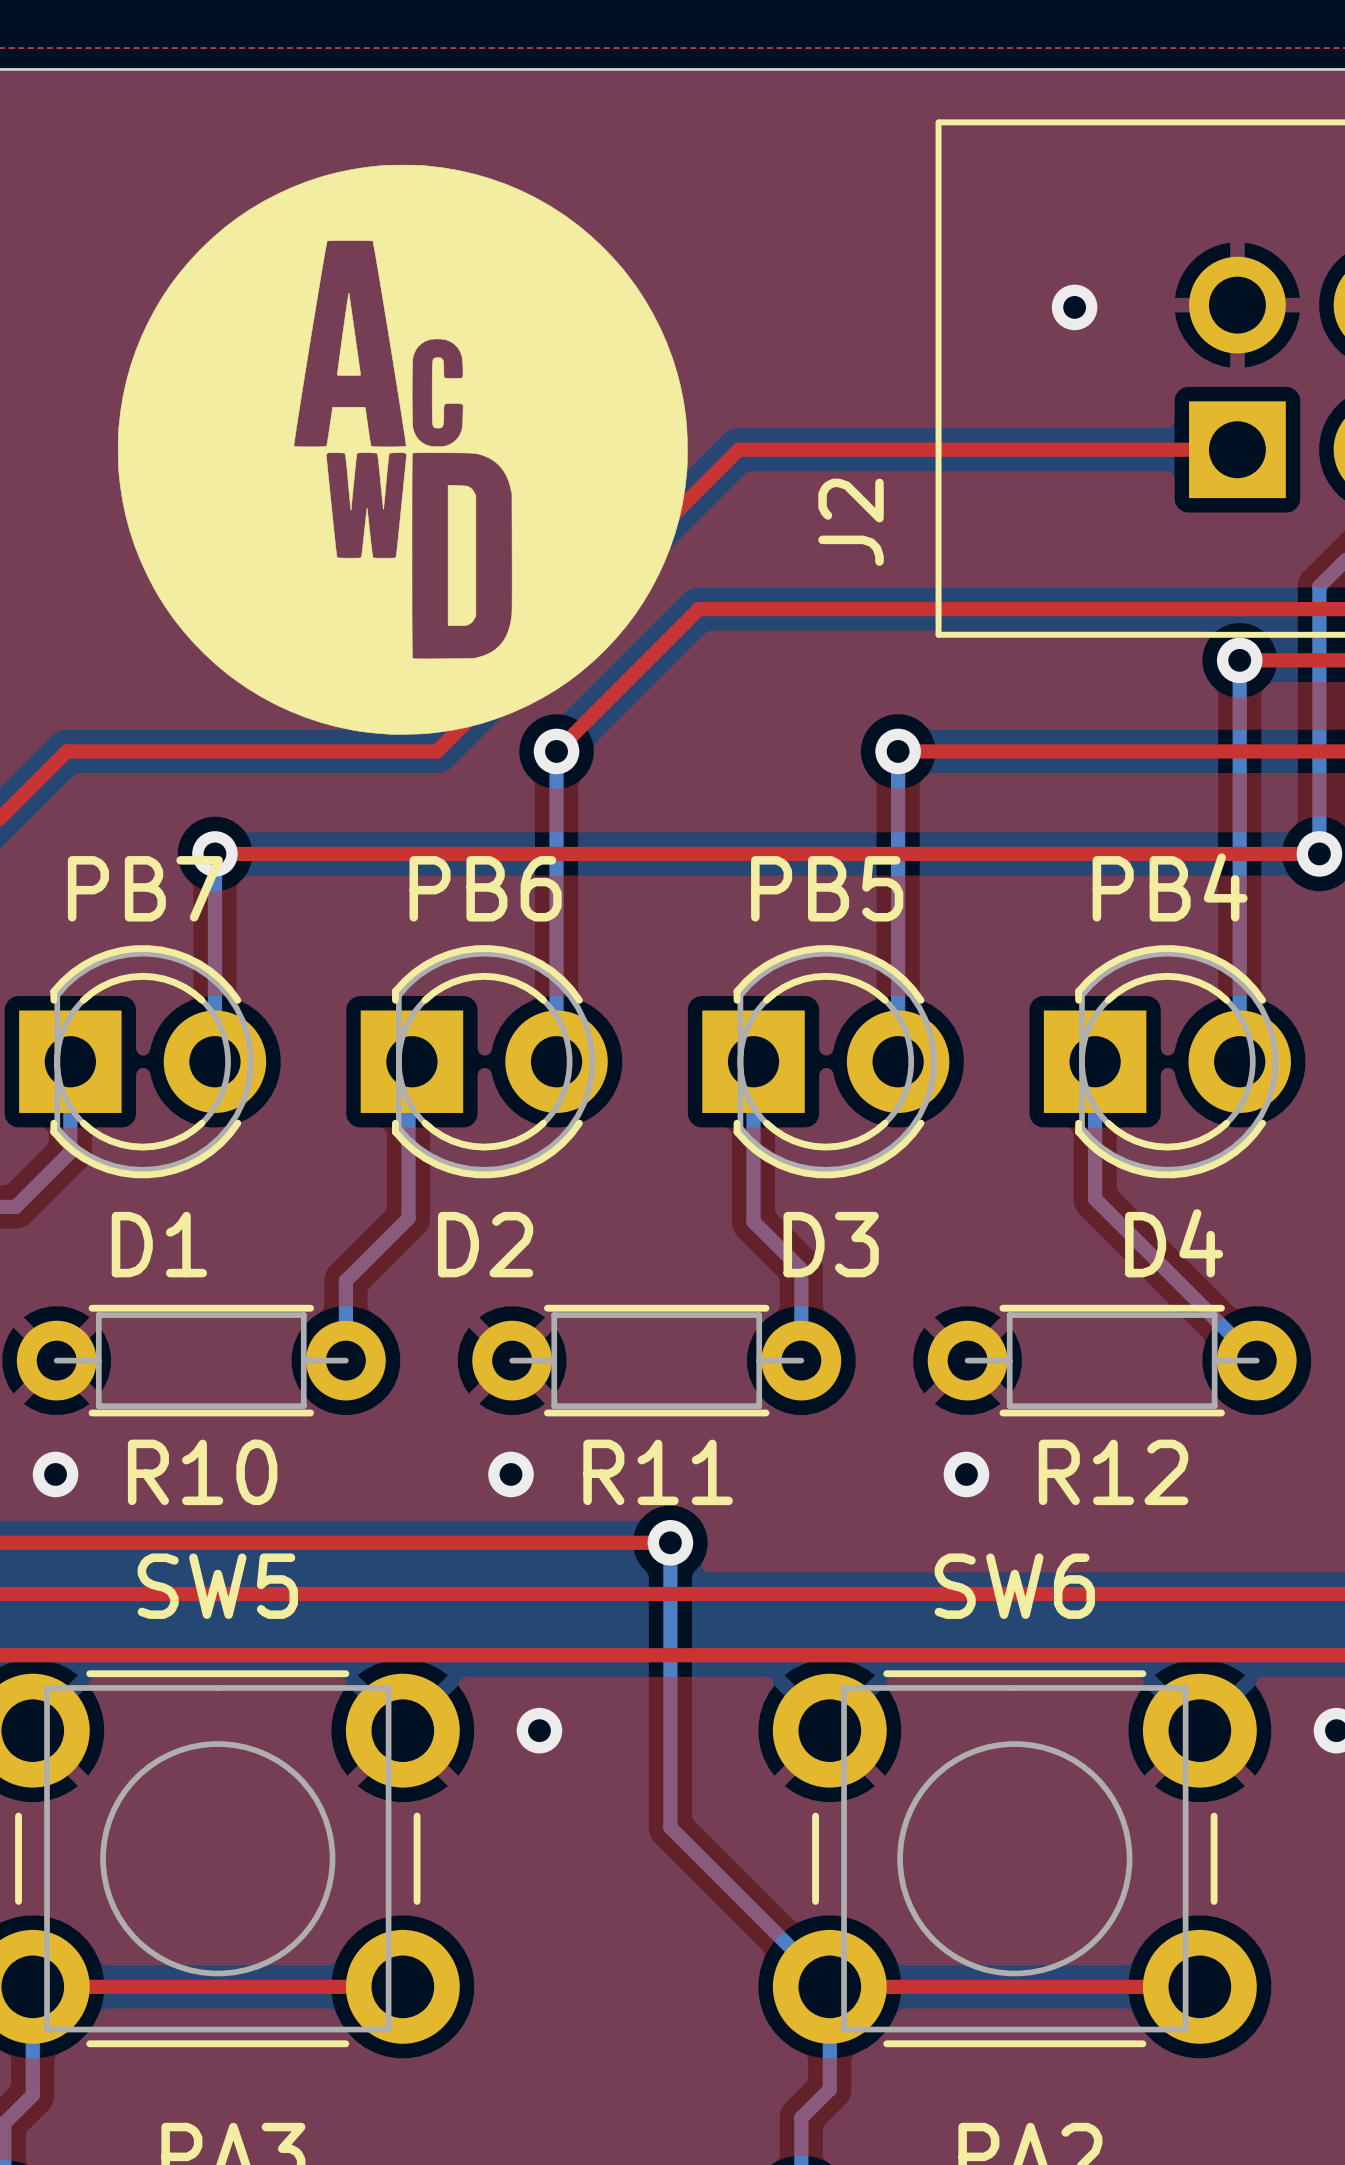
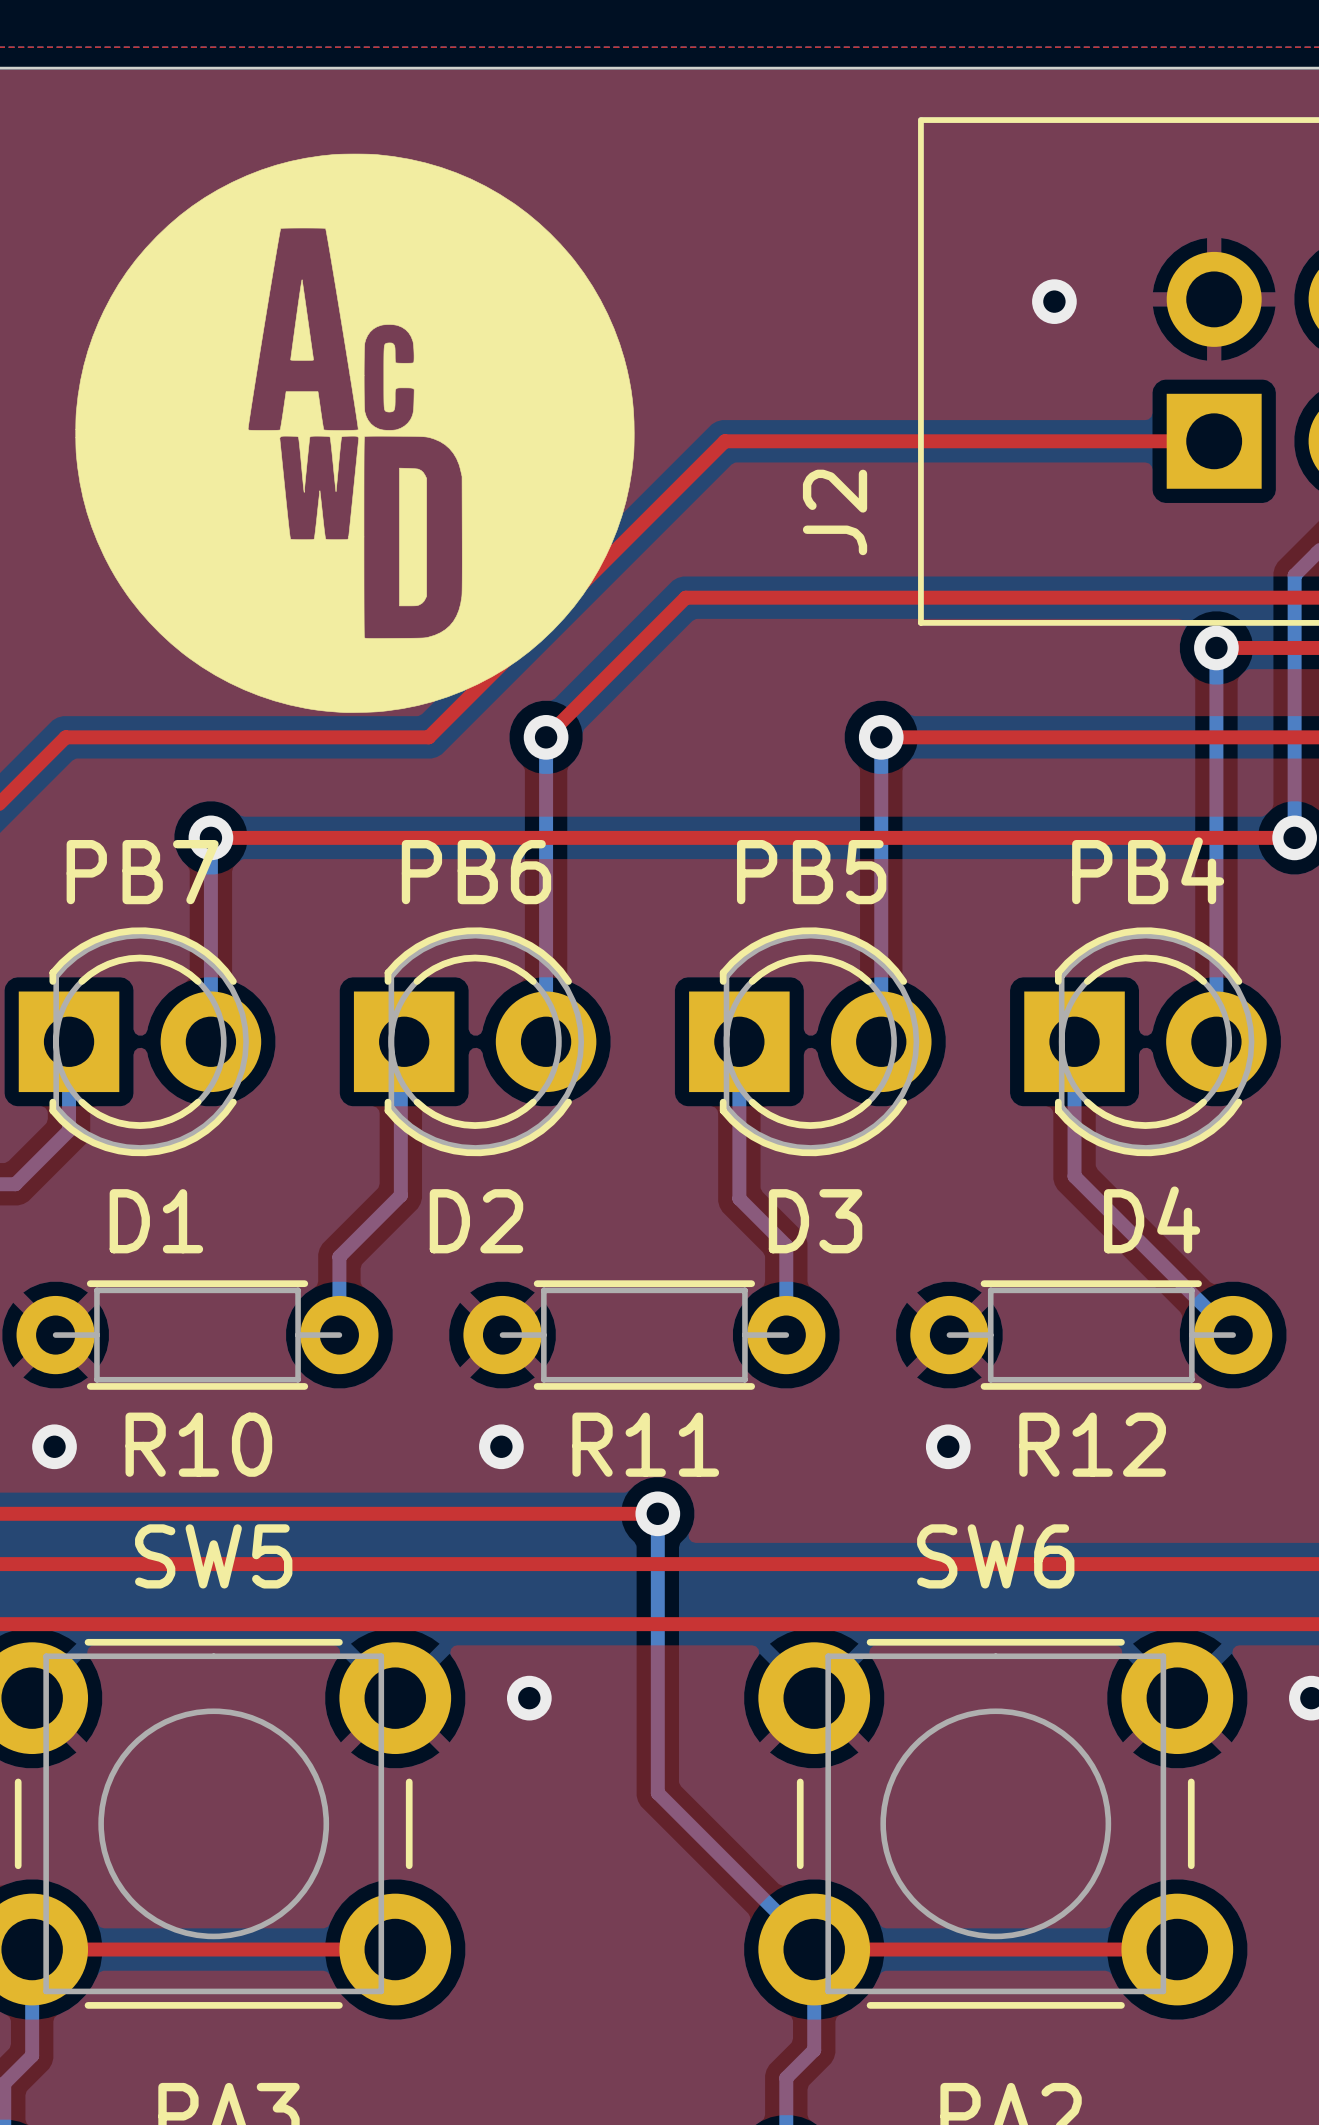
drawing position: (402, 449) -> (354, 433)

